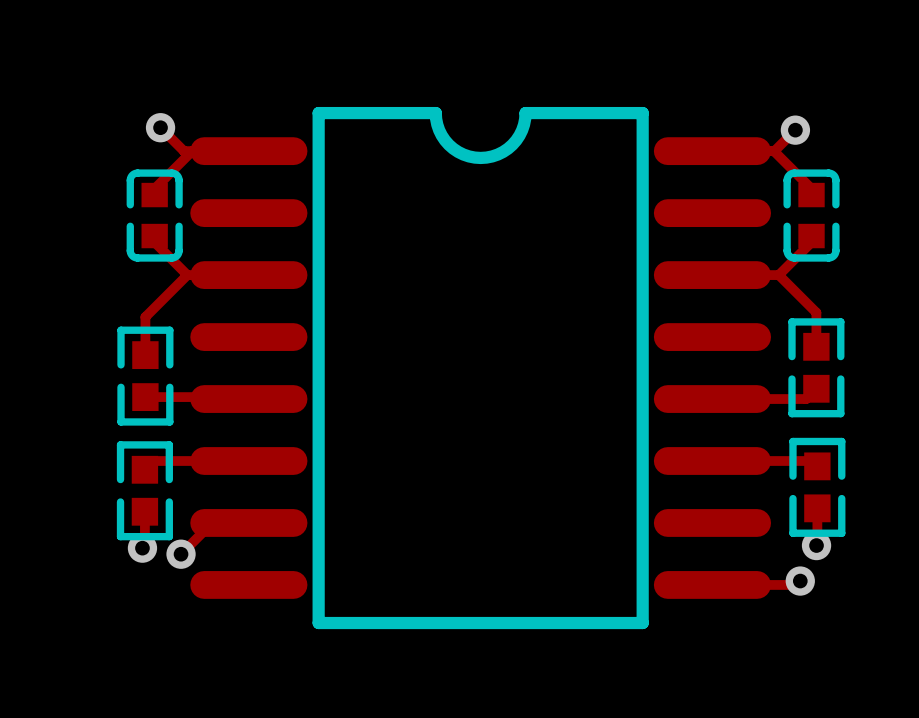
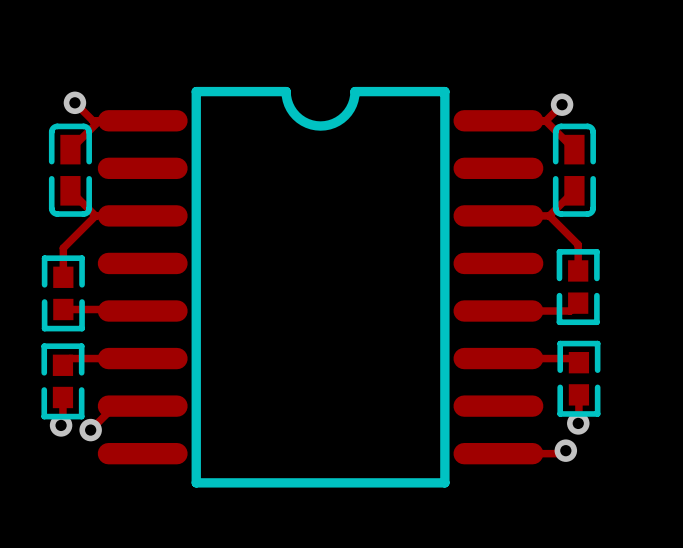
part footprint: [126, 169, 183, 262] -> [48, 123, 92, 217]
part footprint: [783, 169, 840, 262] -> [552, 123, 596, 217]

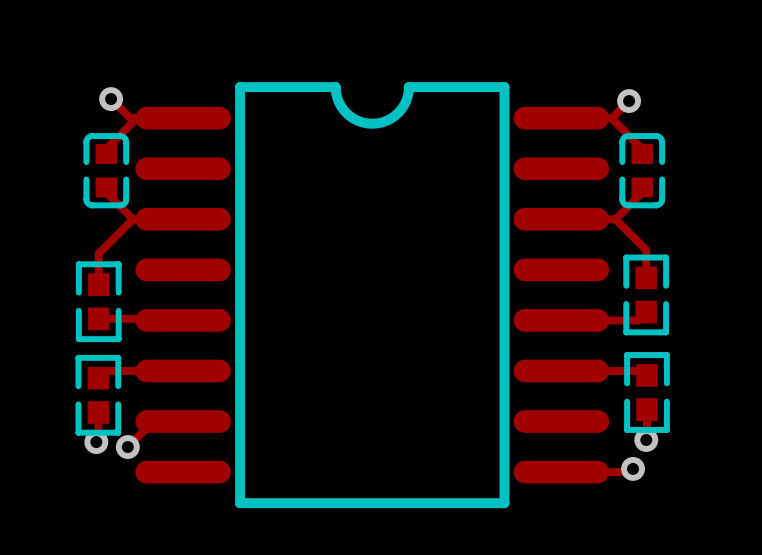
part footprint: [48, 123, 92, 217] -> [83, 133, 130, 209]
part footprint: [552, 123, 596, 217] -> [619, 133, 666, 209]

